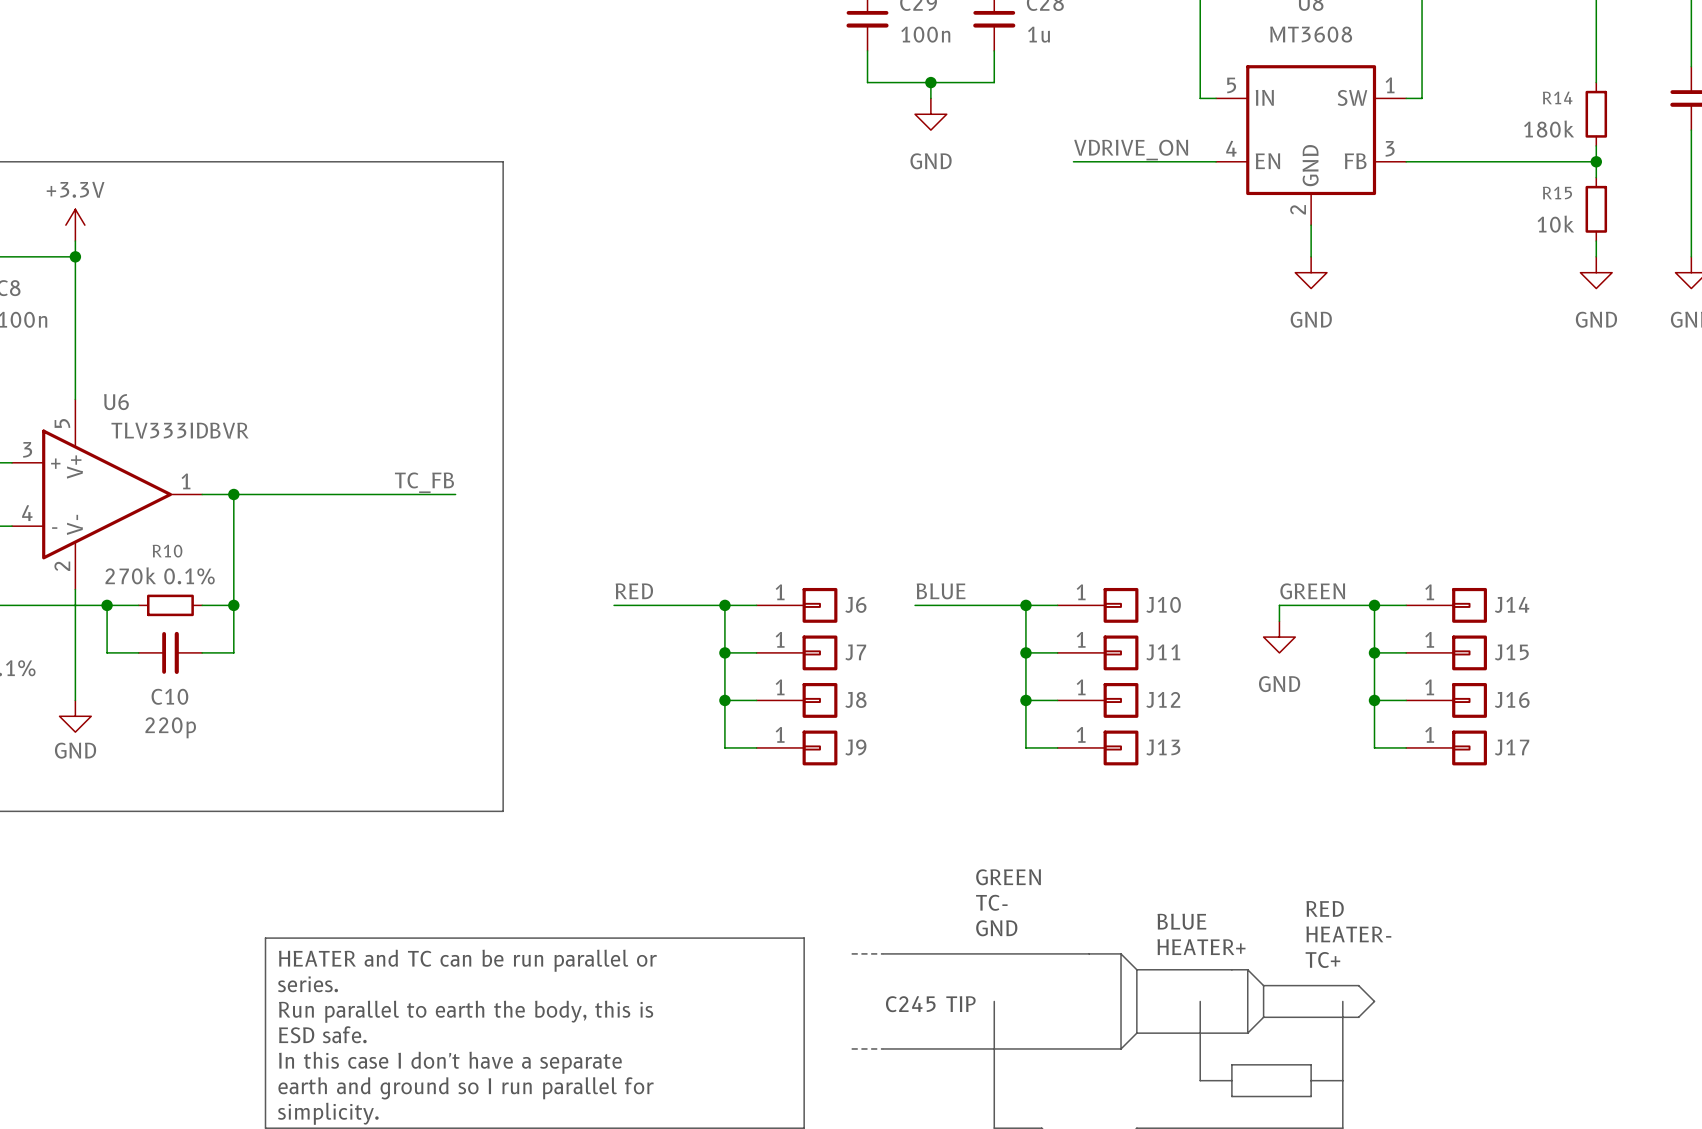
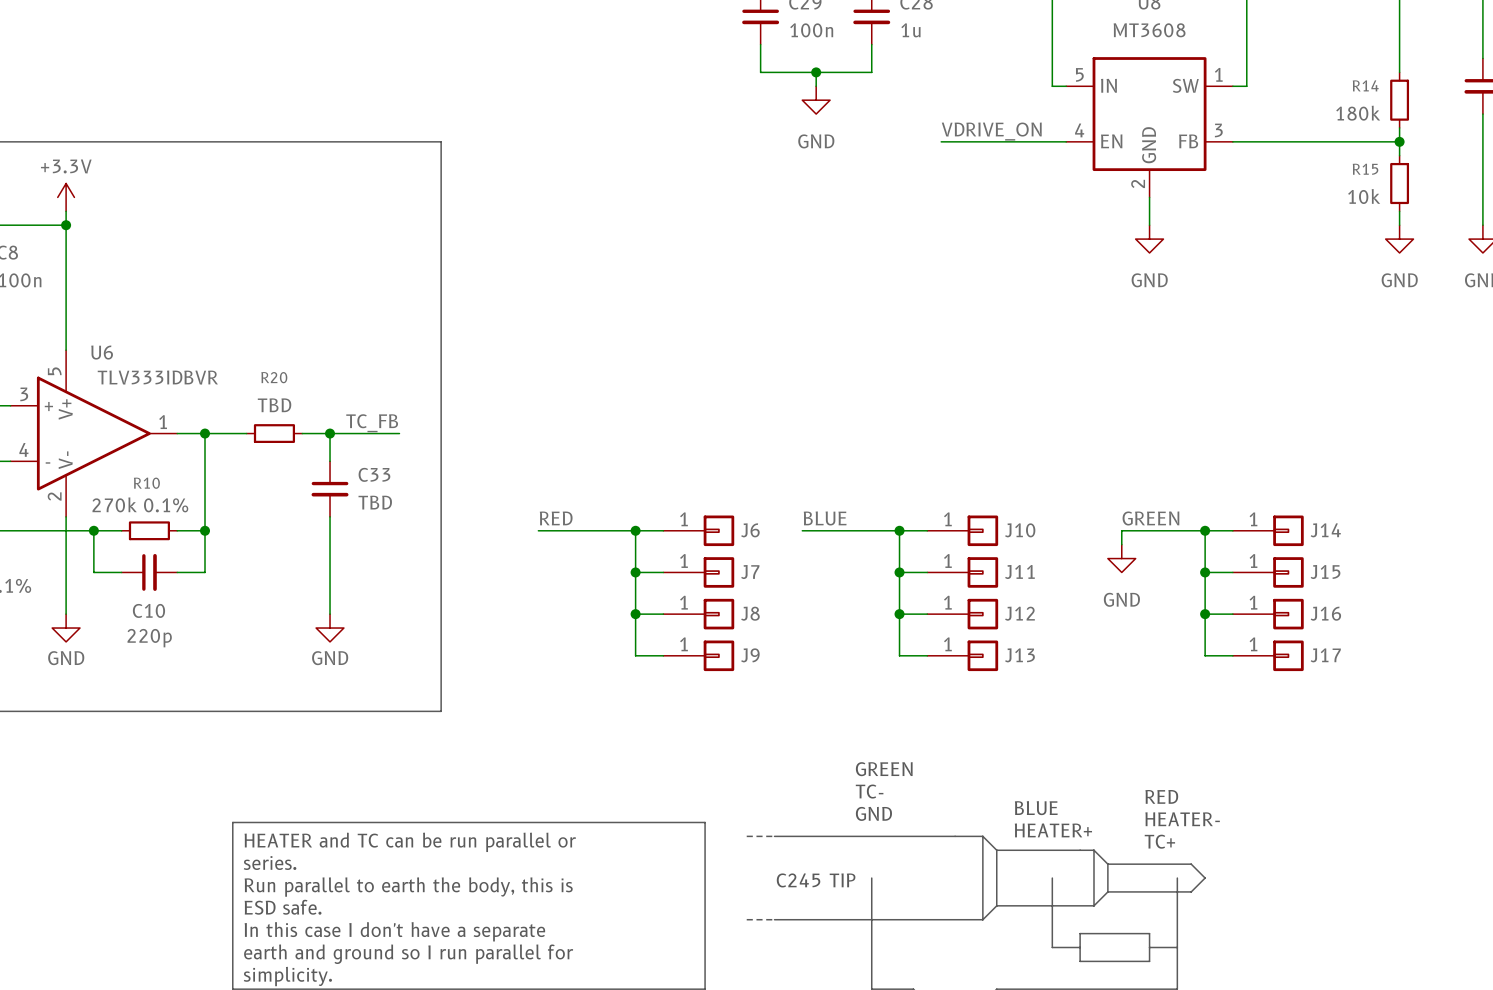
wire: (281, 494) (344, 494) -> none
R20: none -> TBD (274, 433)
wire: none -> (330, 433) (330, 461)
junction: none -> (330, 433)
C33: none -> TBD (330, 489)
wire: none -> (330, 516) (330, 614)
power symbol: none -> GND (330, 628)

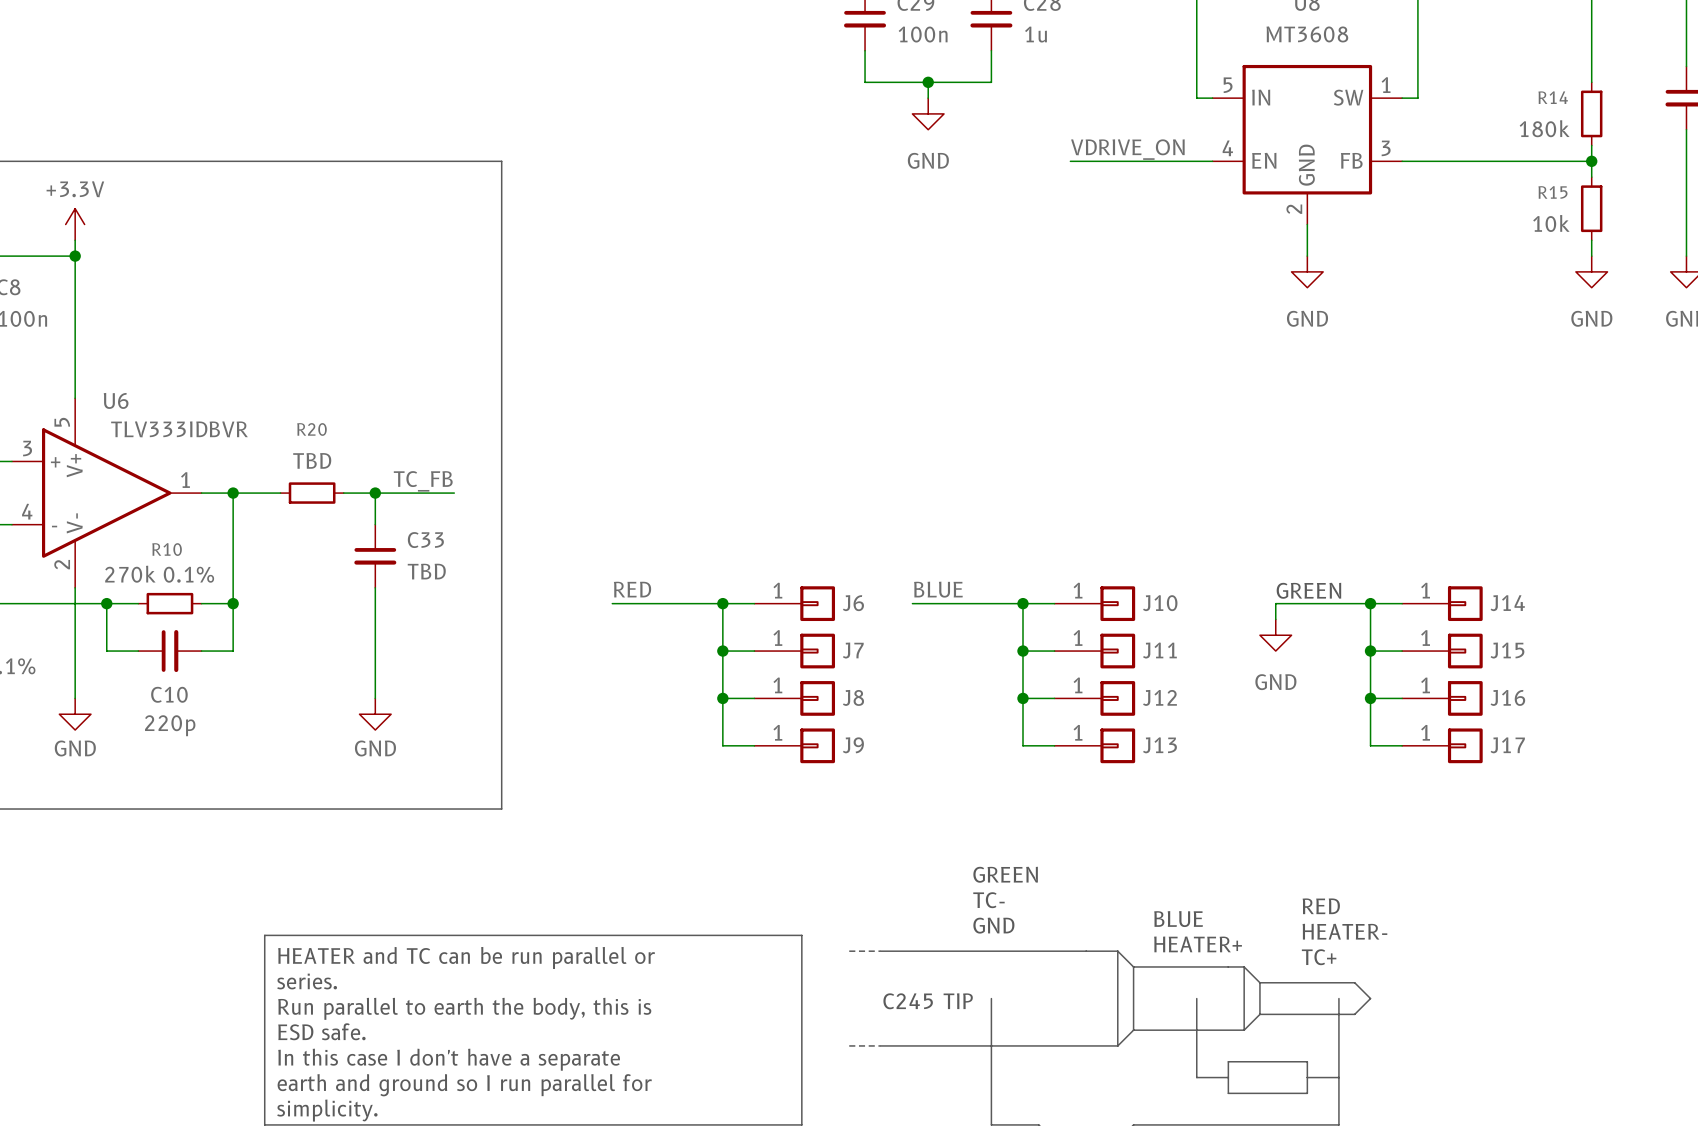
label: GREEN (1150, 518) -> none
text: none -> GREEN (1308, 590)

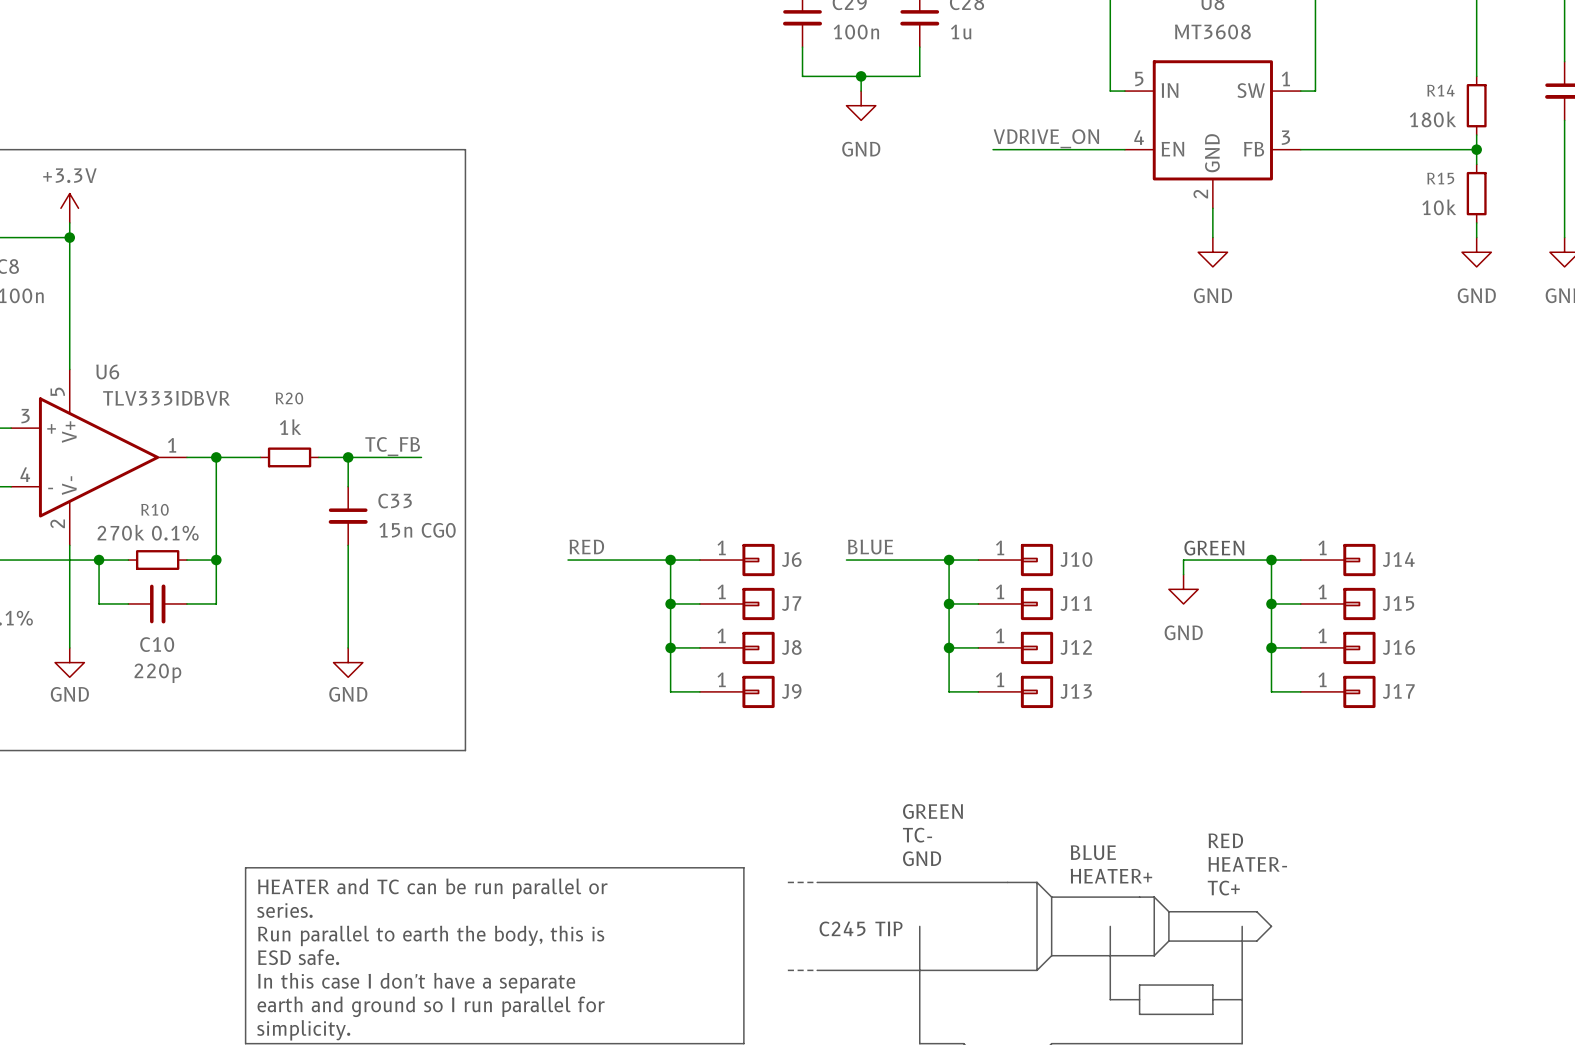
R20 value: TBD (312, 460) -> 1k (290, 427)
C33 value: TBD (426, 571) -> 15n CG0 (417, 530)

